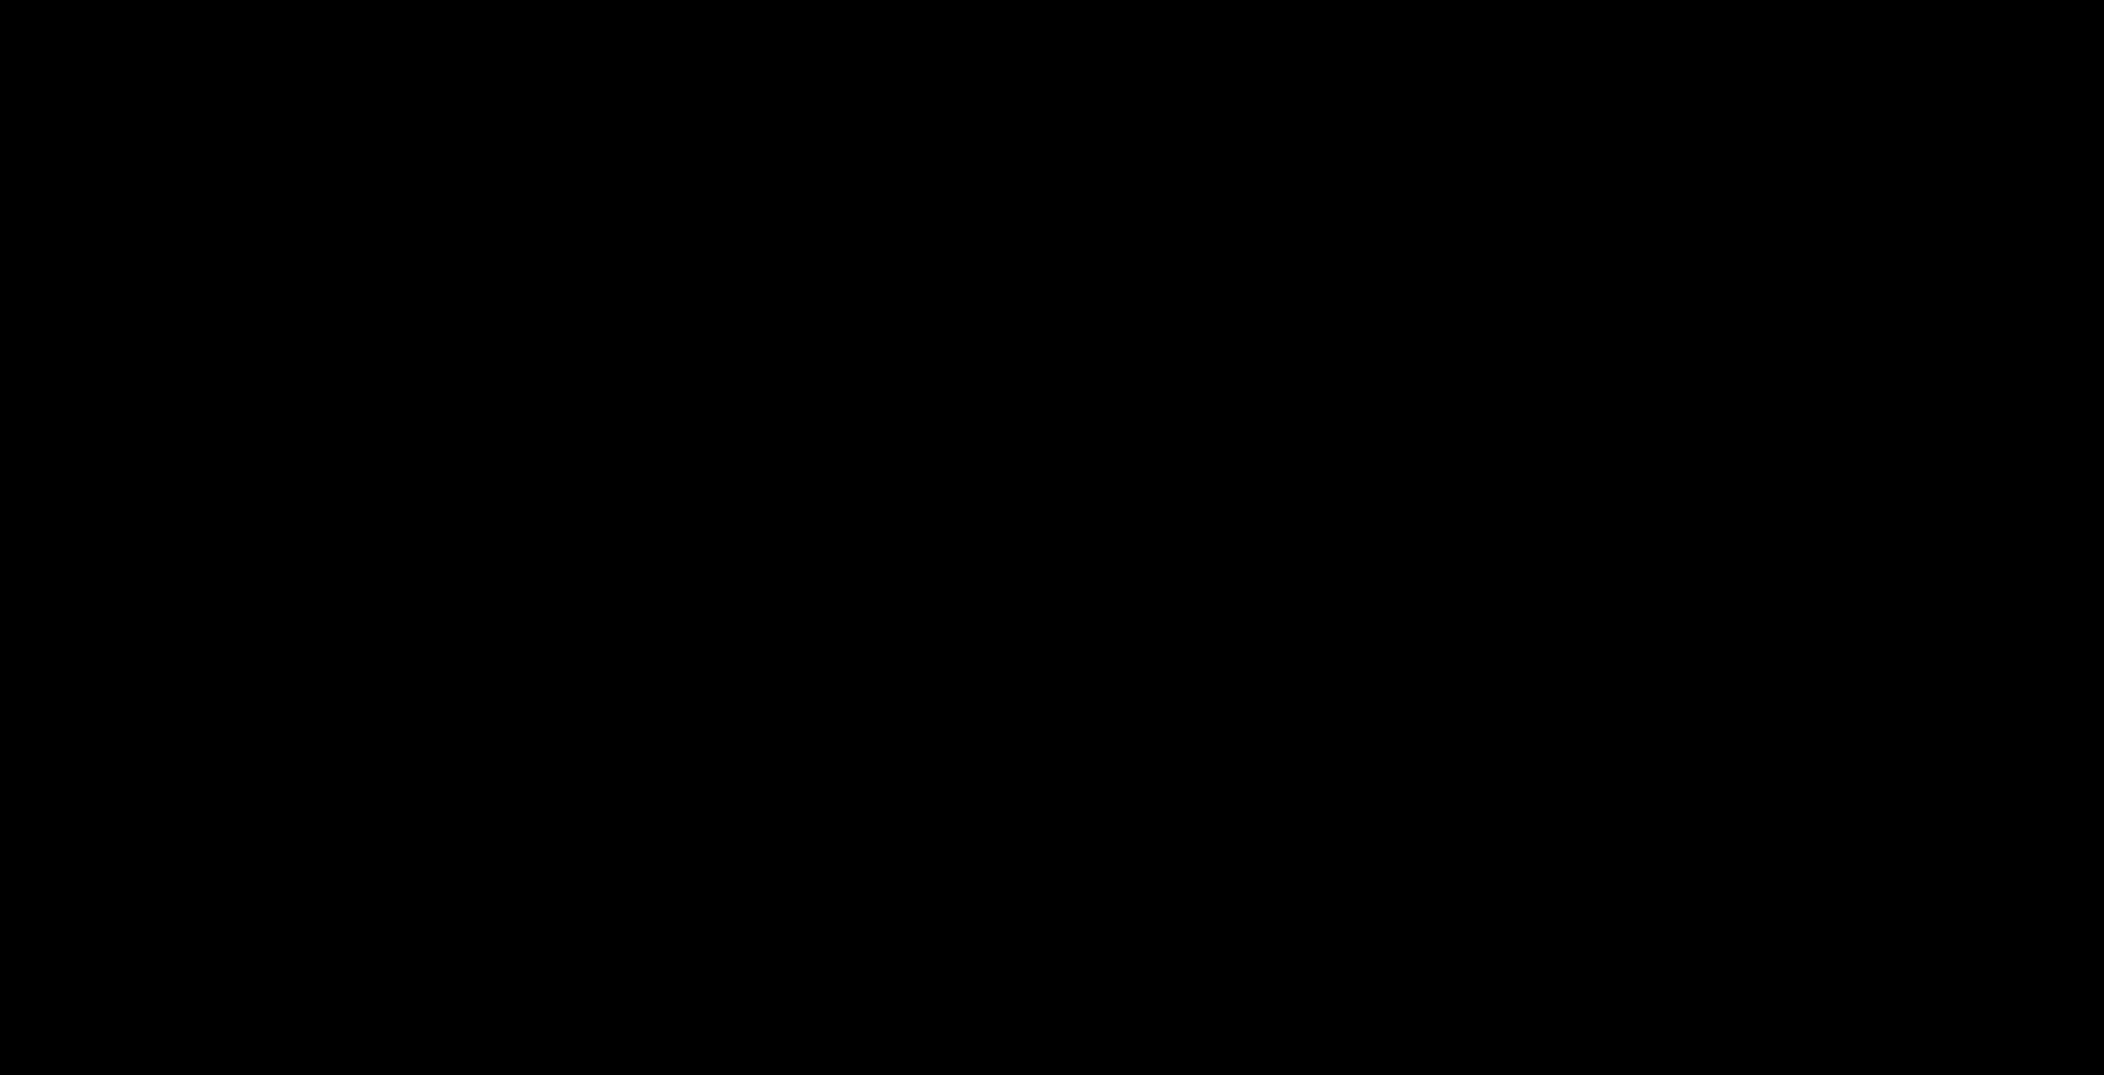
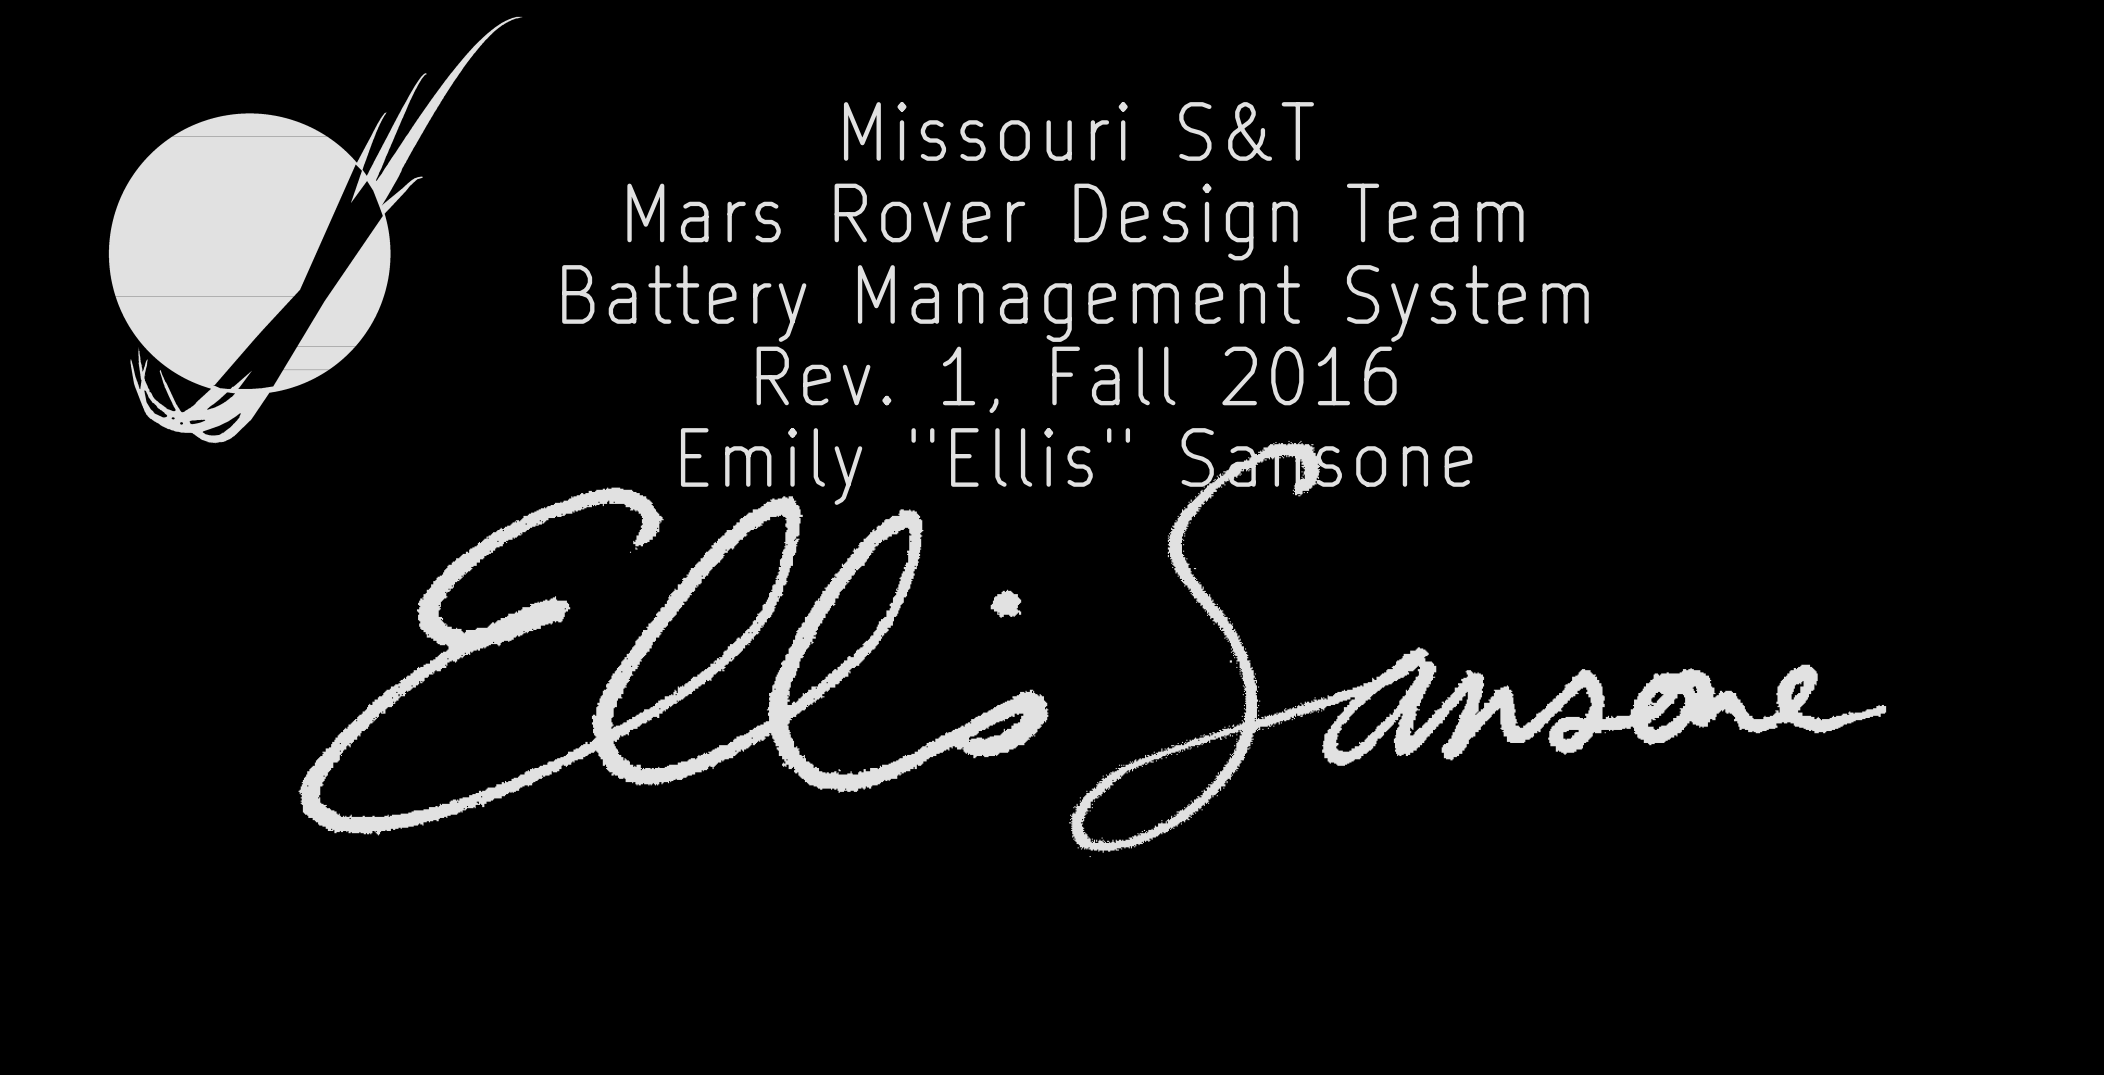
drawing: none -> [108, 16, 1887, 858]
text: none -> Missouri S&T (1078, 131)
text: none -> Mars Rover Design Team (1075, 222)
text: none -> Battery Management System (1075, 303)
text: none -> Rev. 1, Fall 2016 (1076, 379)
text: none -> Emily "Ellis" Sansone (1076, 466)

